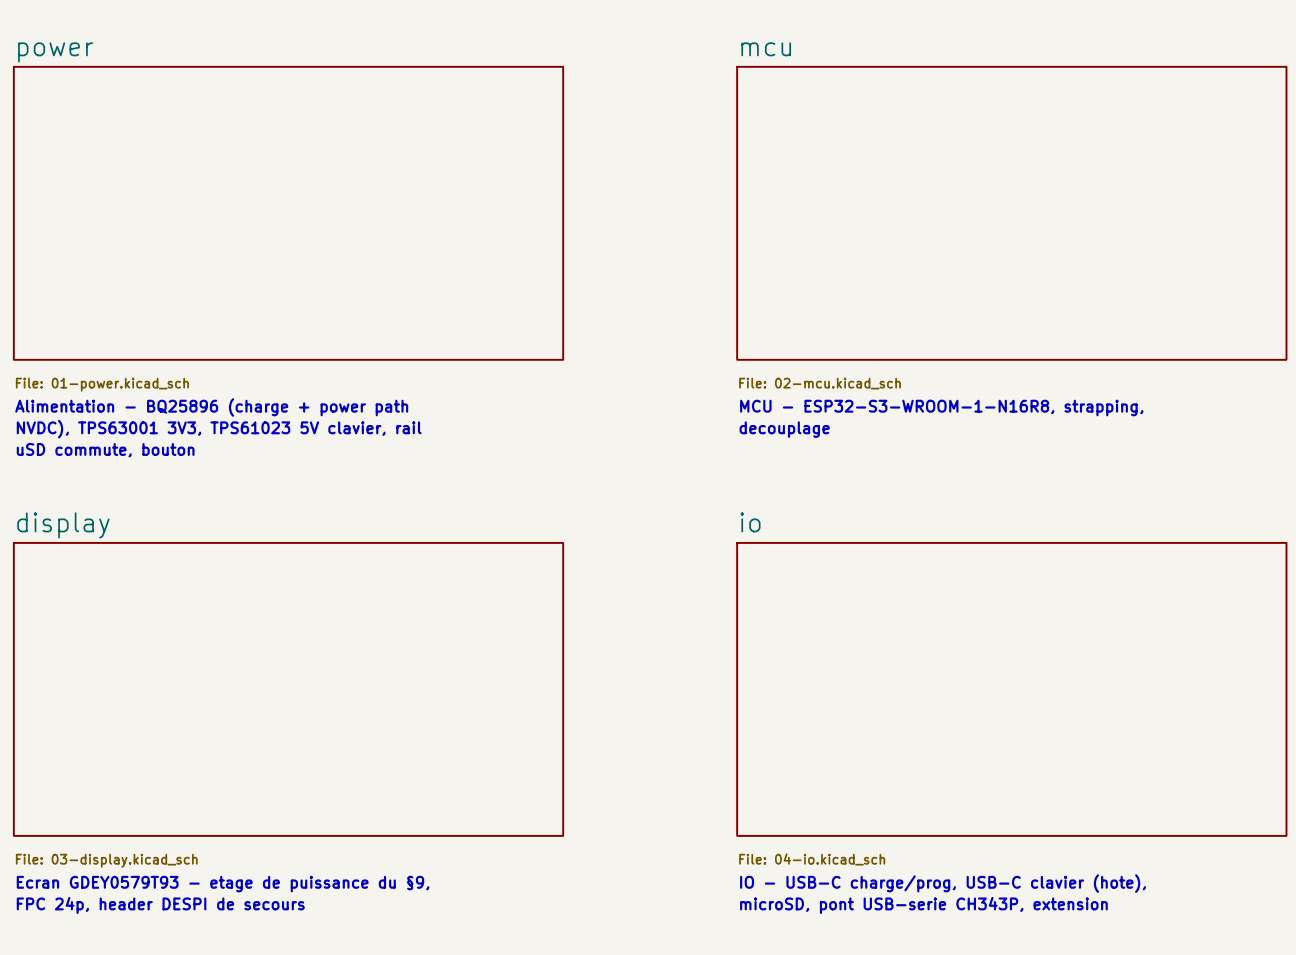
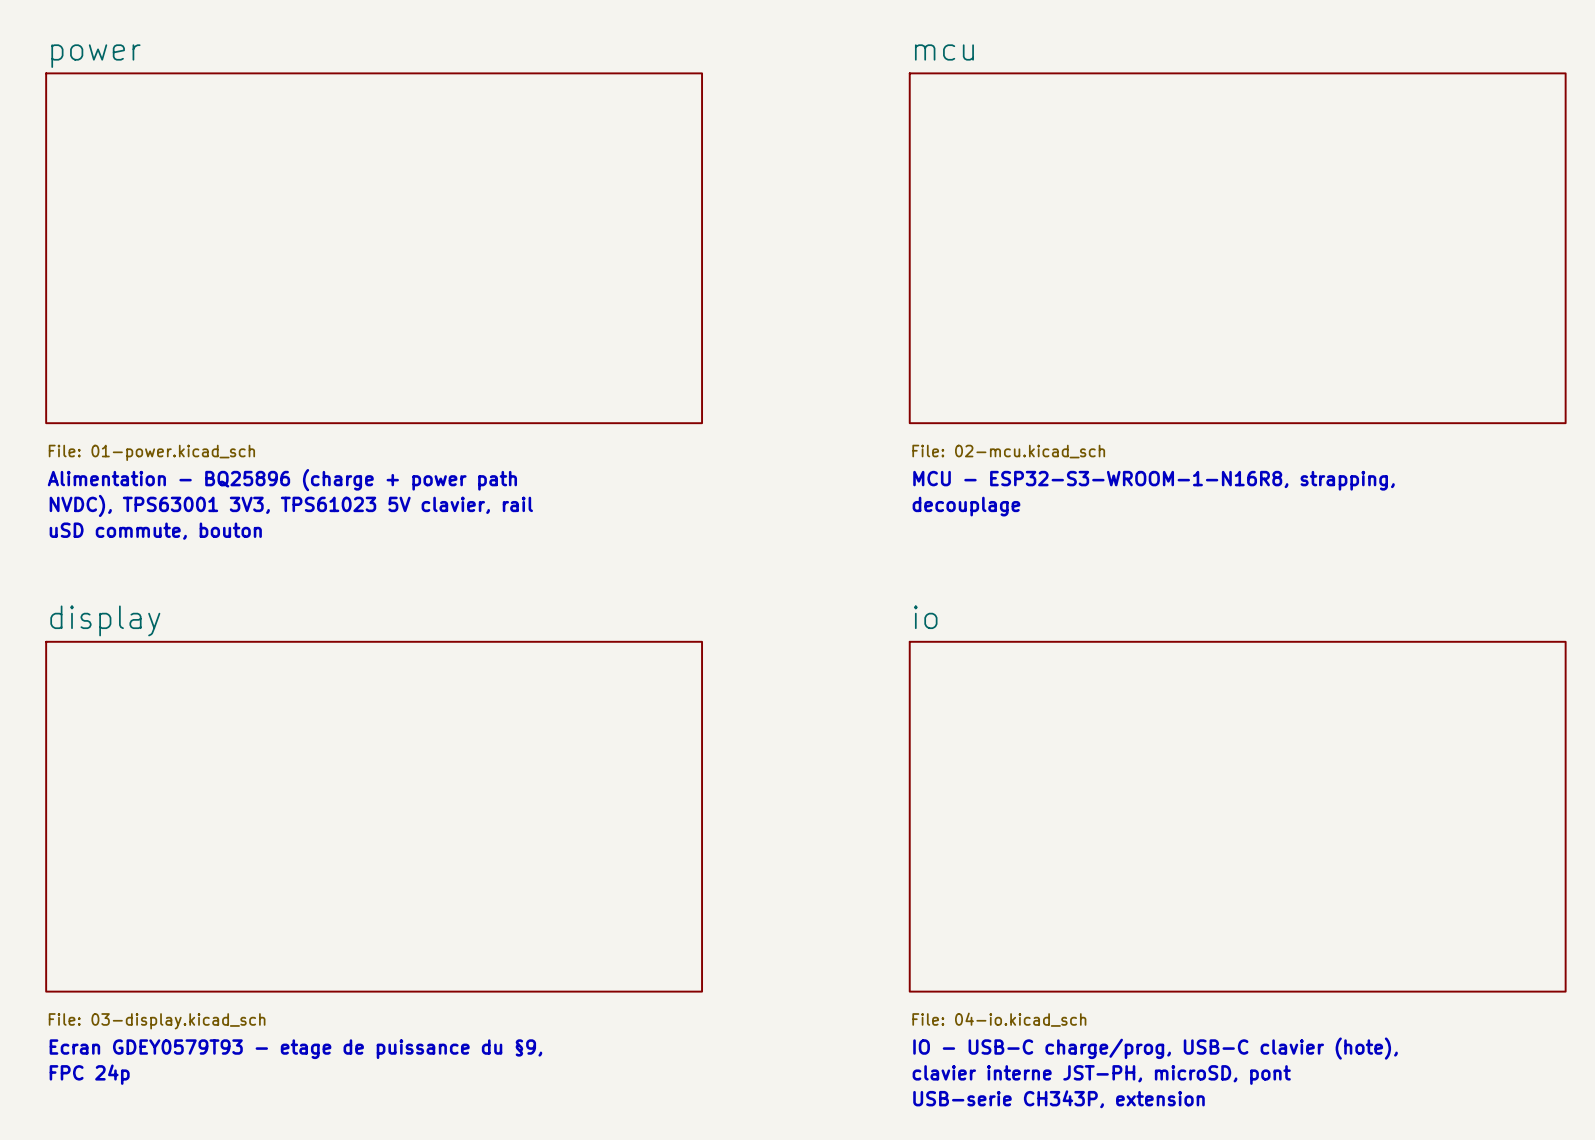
text: FPC 24p, header DESPI de secours (160, 905) -> FPC 24p (89, 1074)
text: microSD, pont USB-serie CH343P, extension (923, 905) -> clavier interne JST-PH, microSD, pont (1101, 1074)
text: none -> USB-serie CH343P, extension (1059, 1099)

